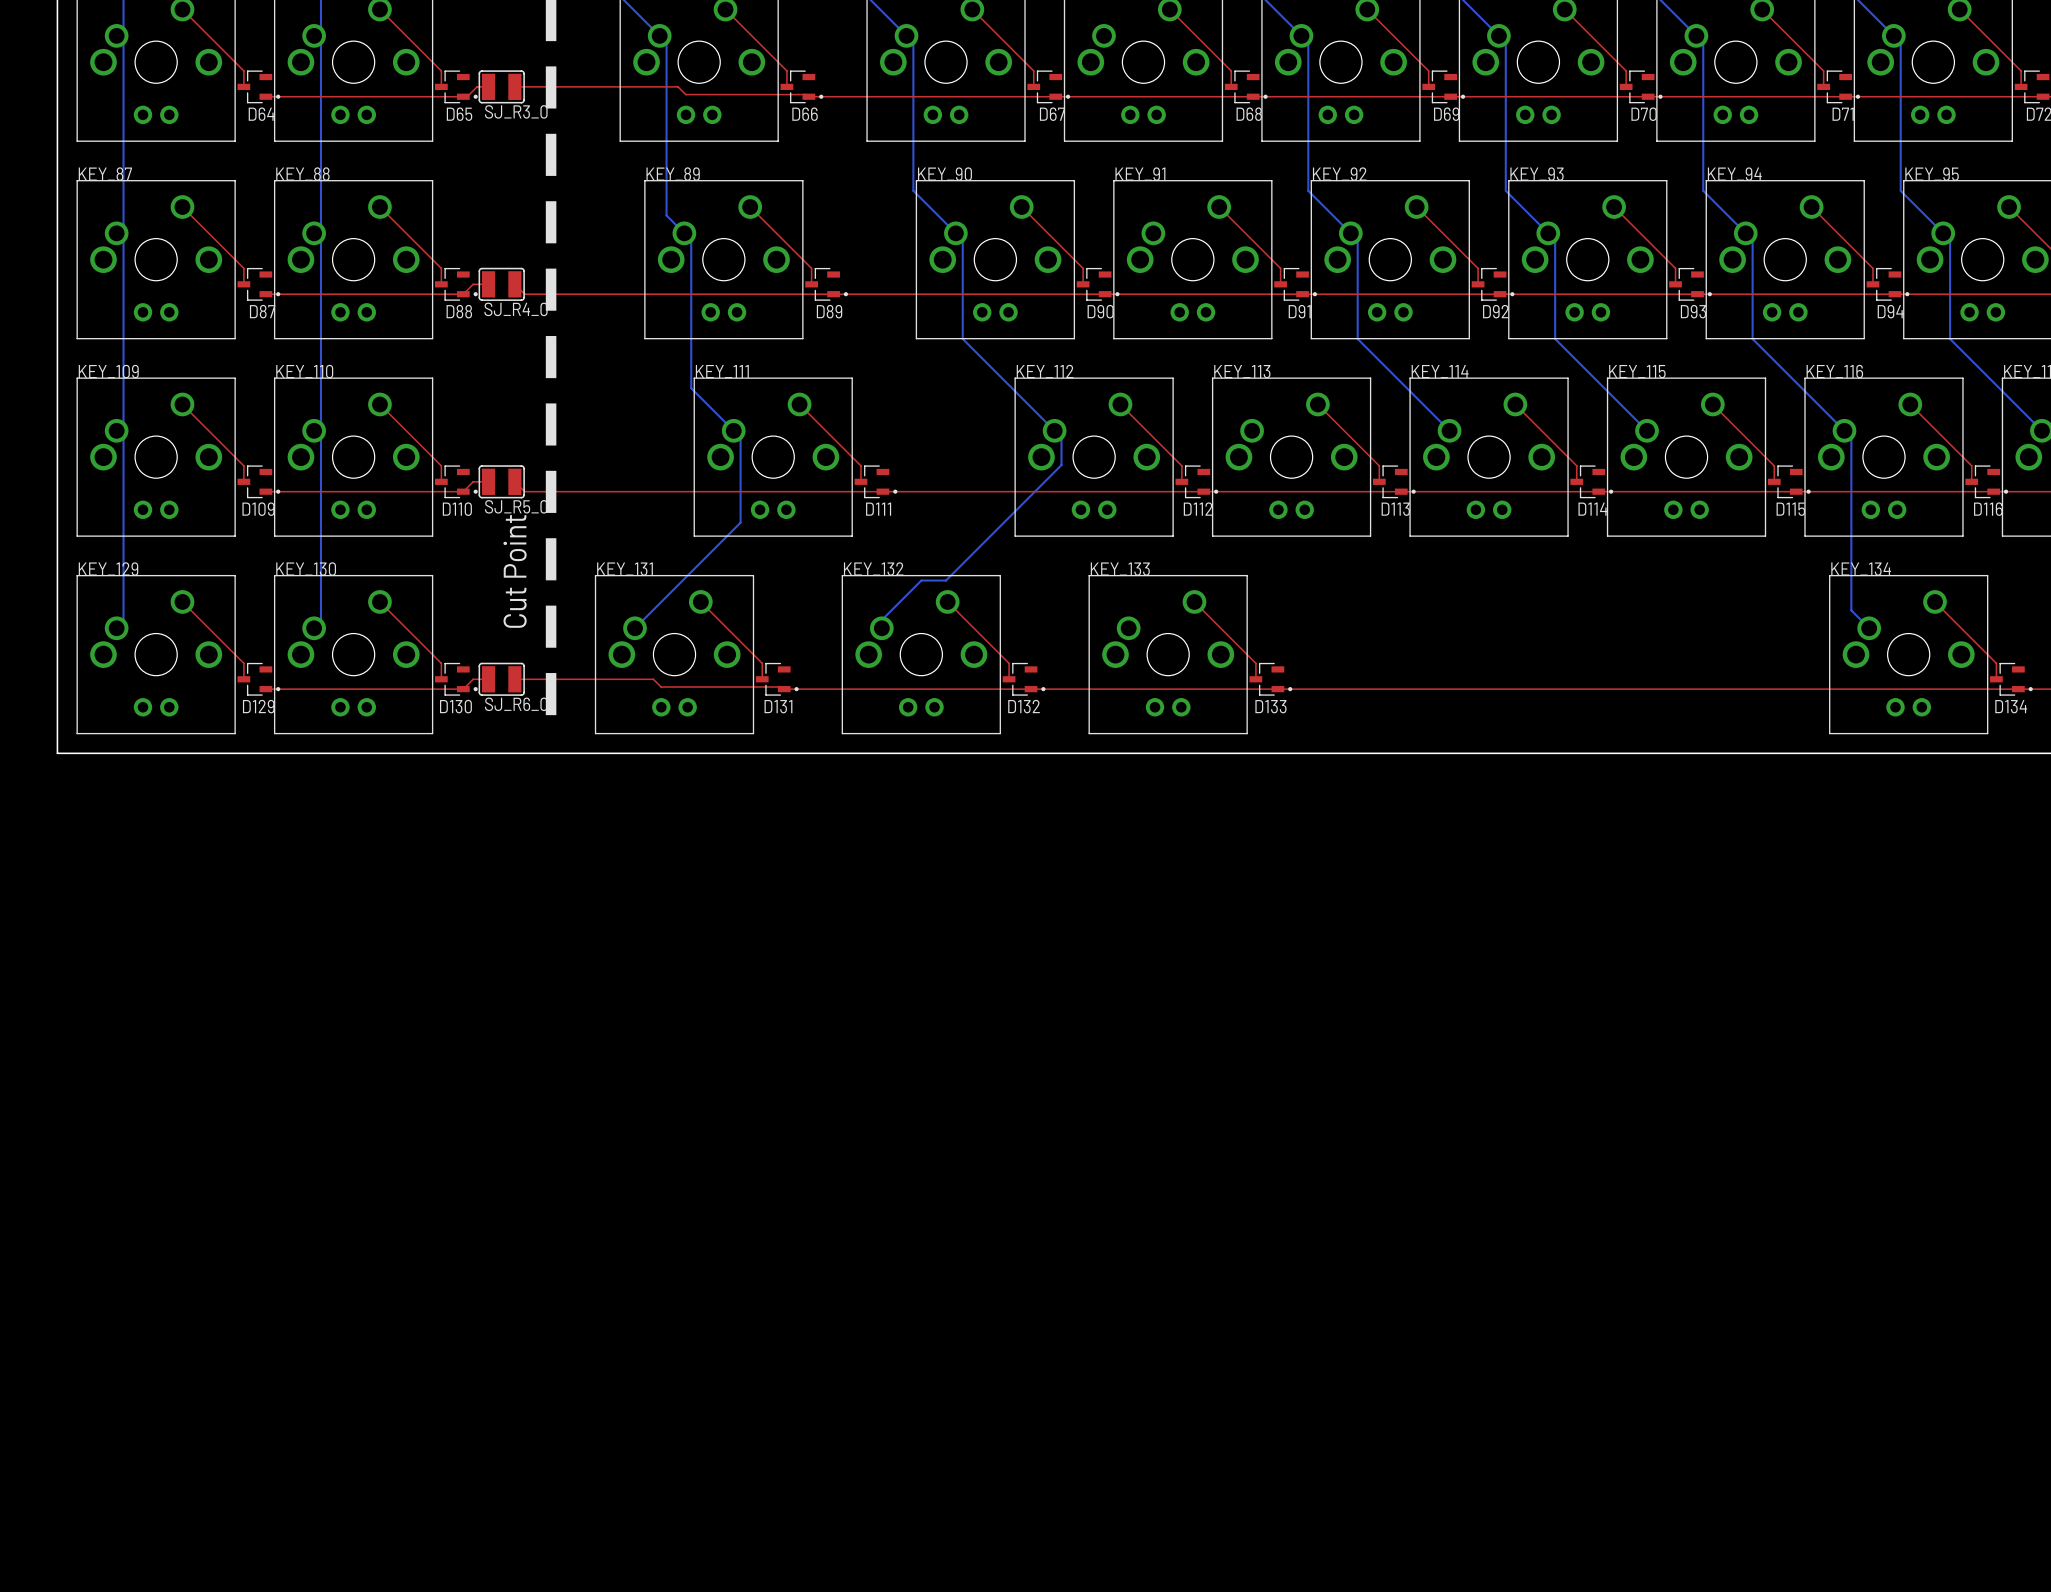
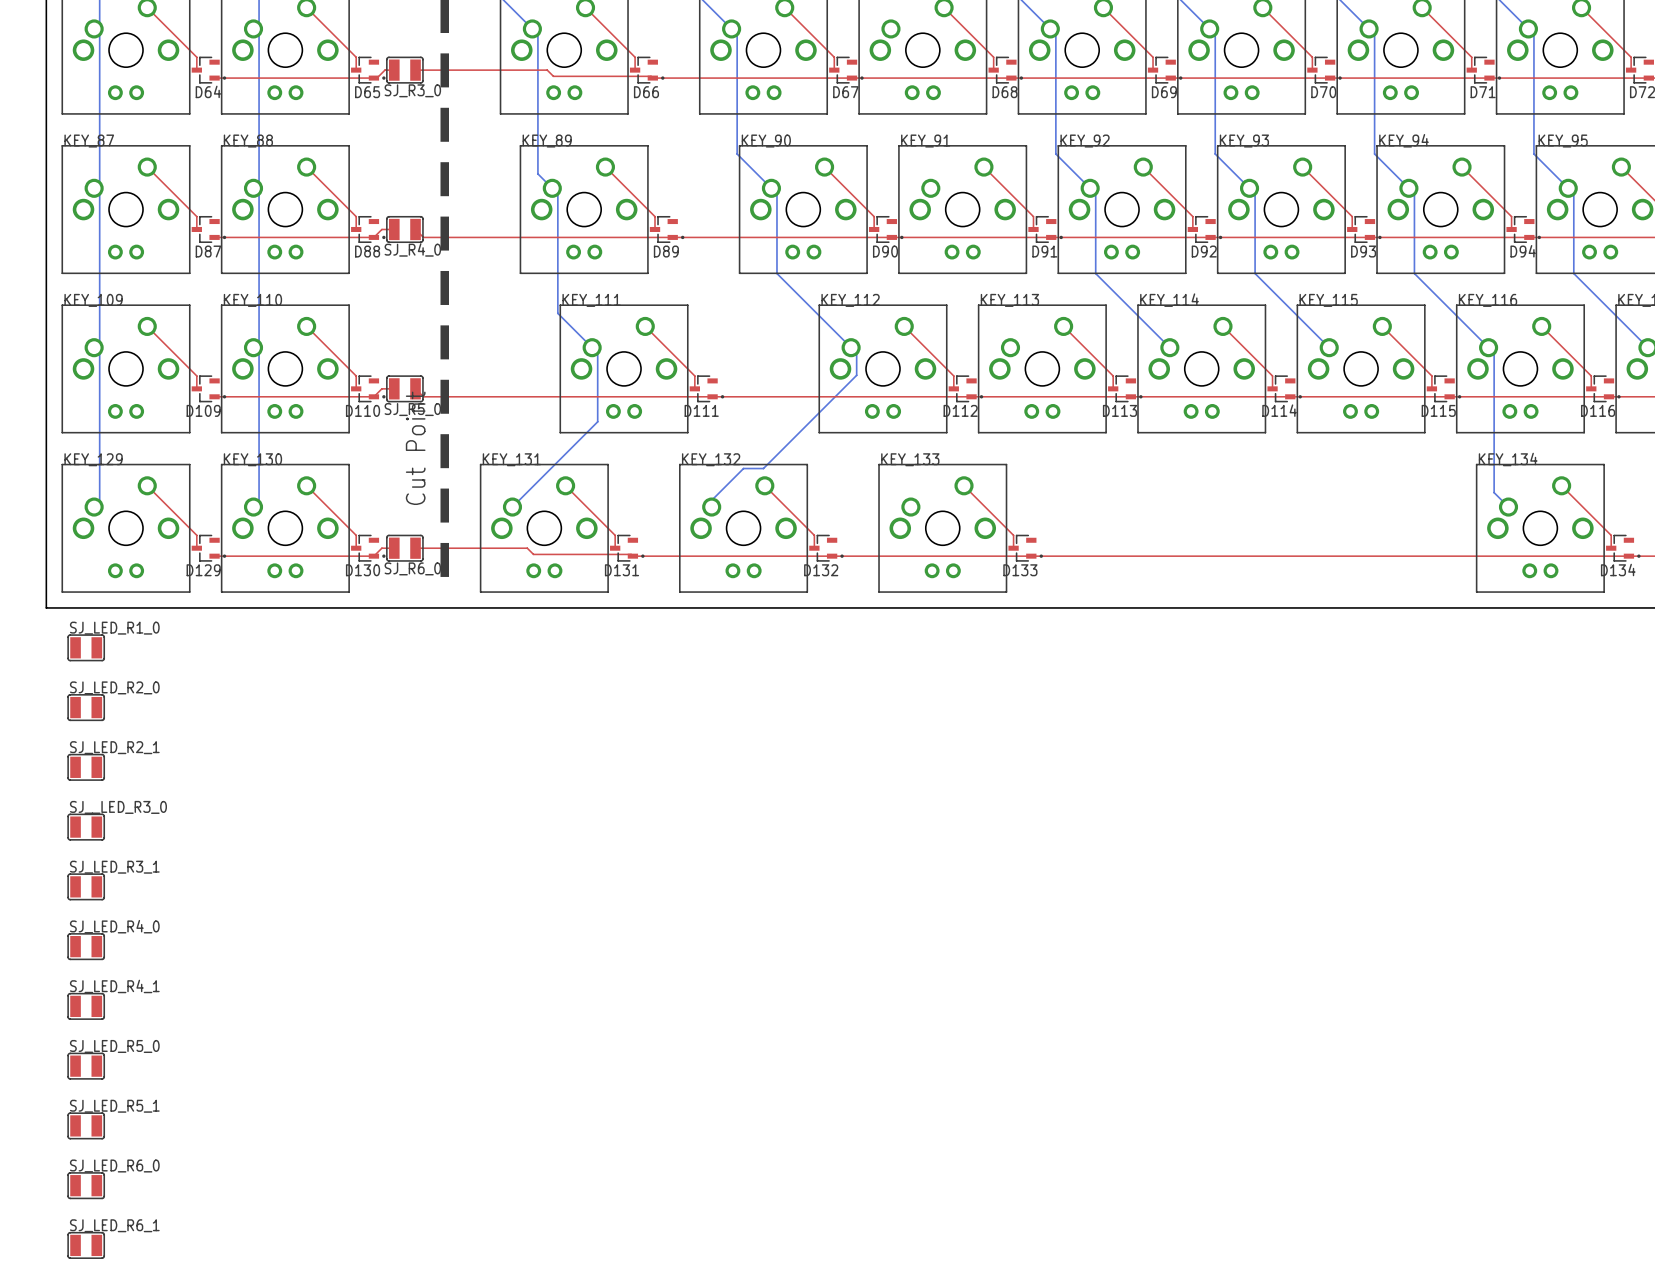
SJ_LED_R1_0: none -> (86, 647)
SJ_LED_R2_0: none -> (86, 707)
SJ_LED_R2_1: none -> (86, 767)
SJ__LED_R3_0: none -> (86, 827)
SJ_LED_R3_1: none -> (86, 886)
SJ_LED_R4_0: none -> (86, 946)
SJ_LED_R4_1: none -> (86, 1006)
SJ_LED_R5_0: none -> (86, 1066)
SJ_LED_R5_1: none -> (86, 1125)
SJ_LED_R6_0: none -> (86, 1185)
SJ_LED_R6_1: none -> (86, 1245)

